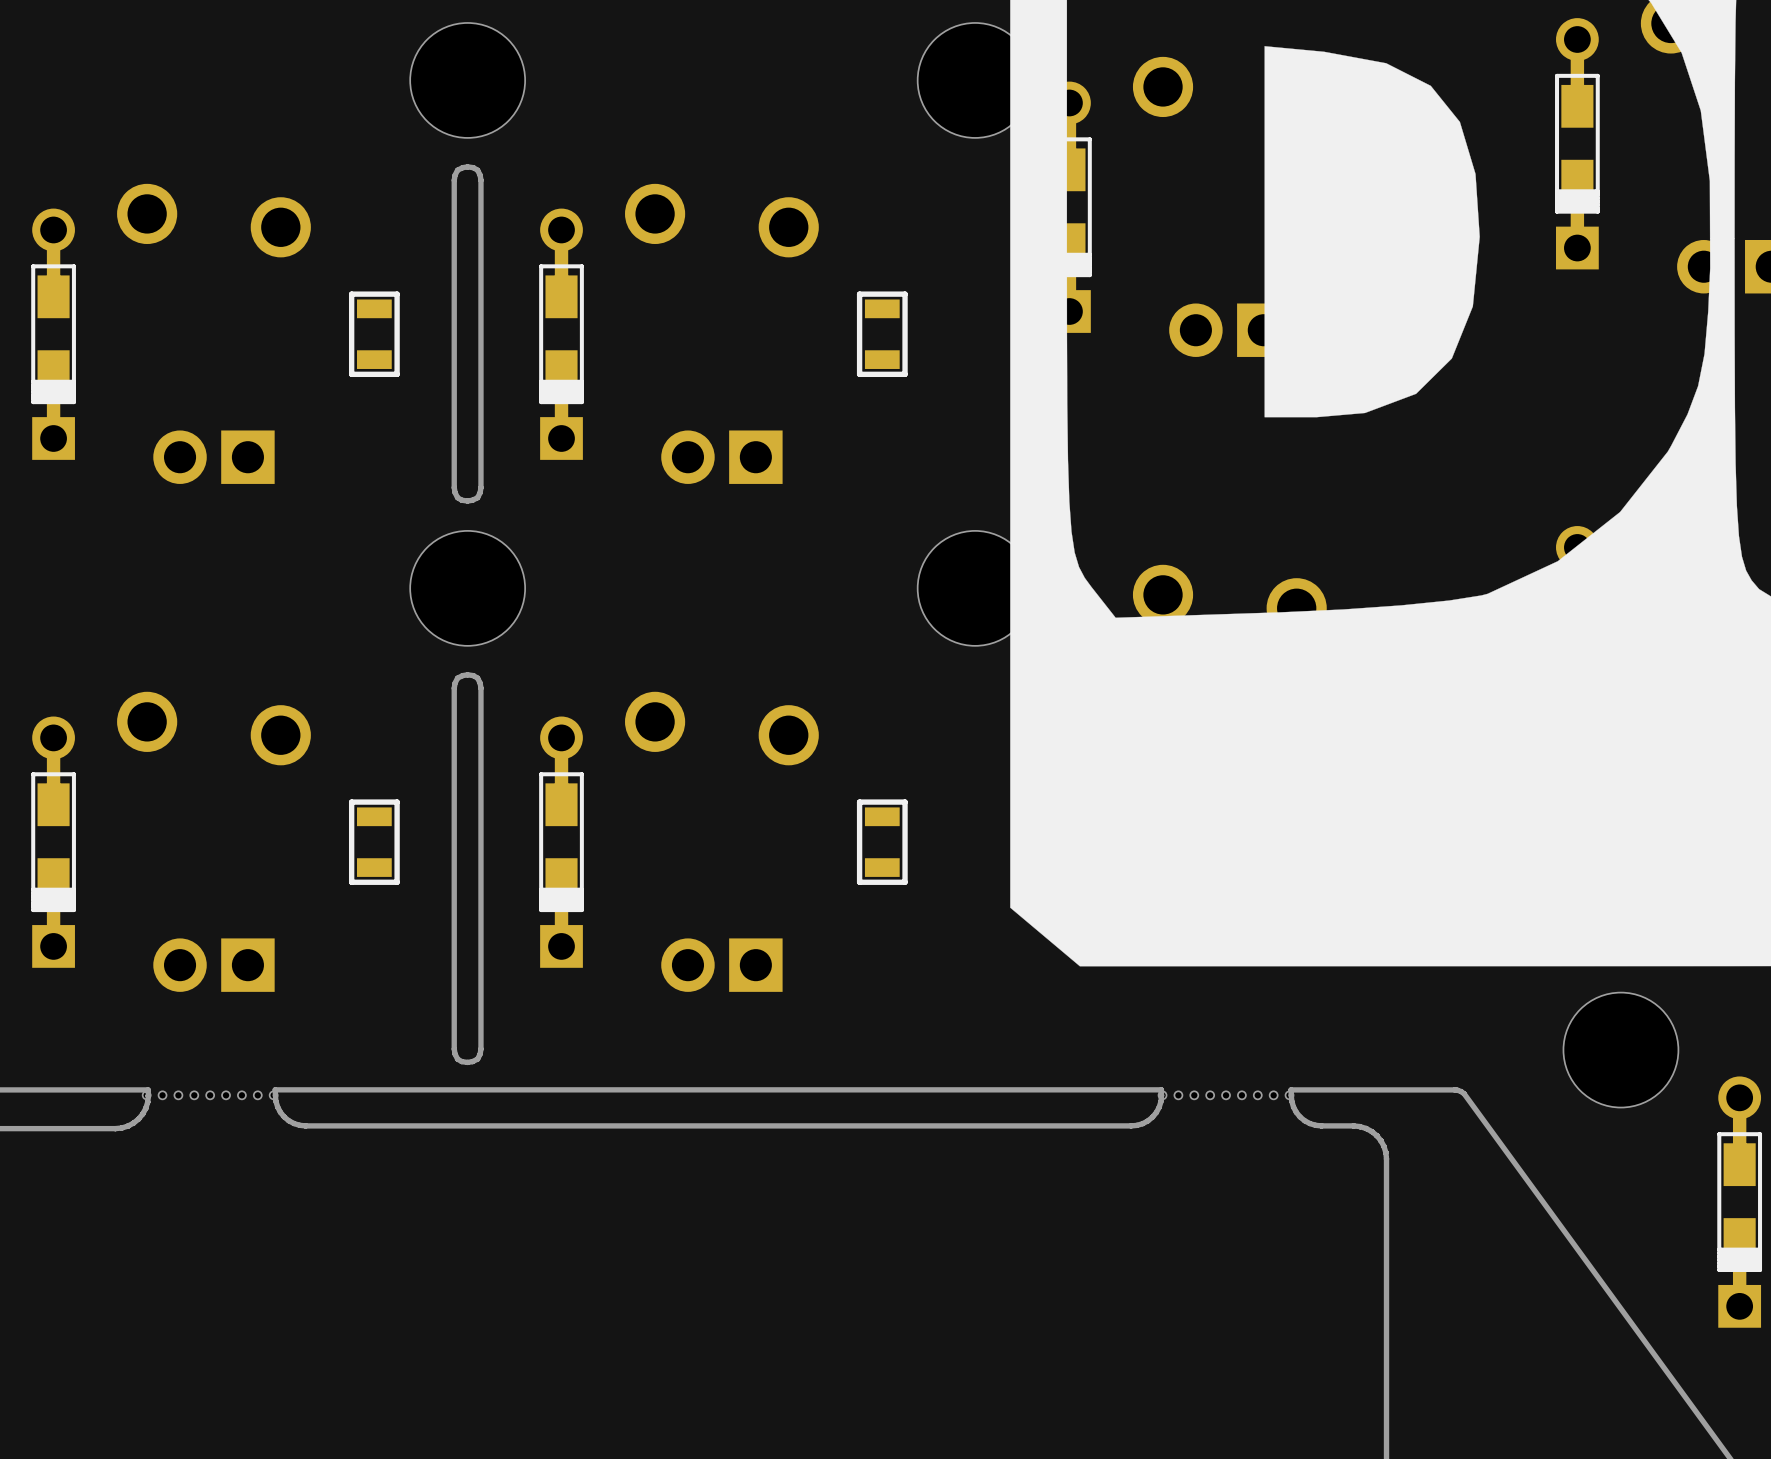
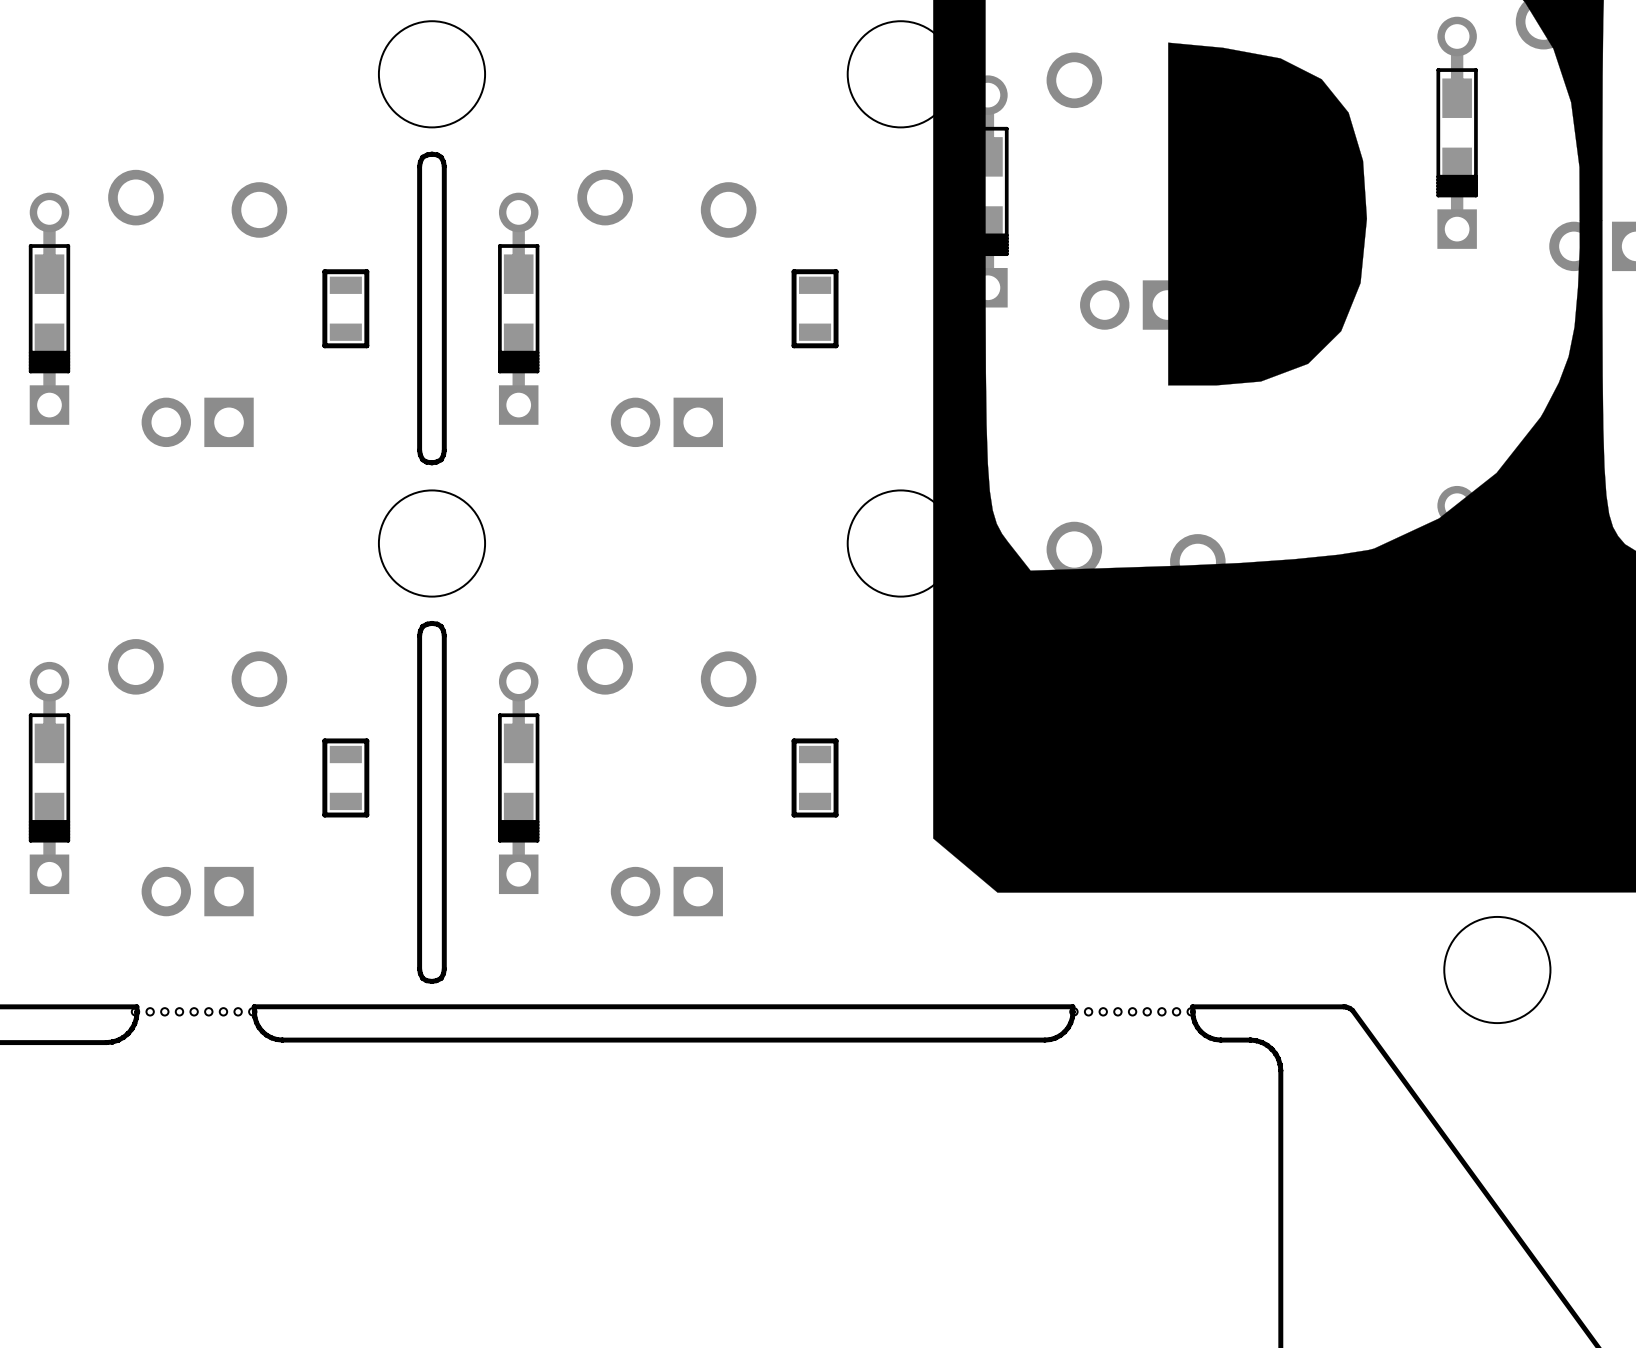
part: (1739, 1202) -> none

